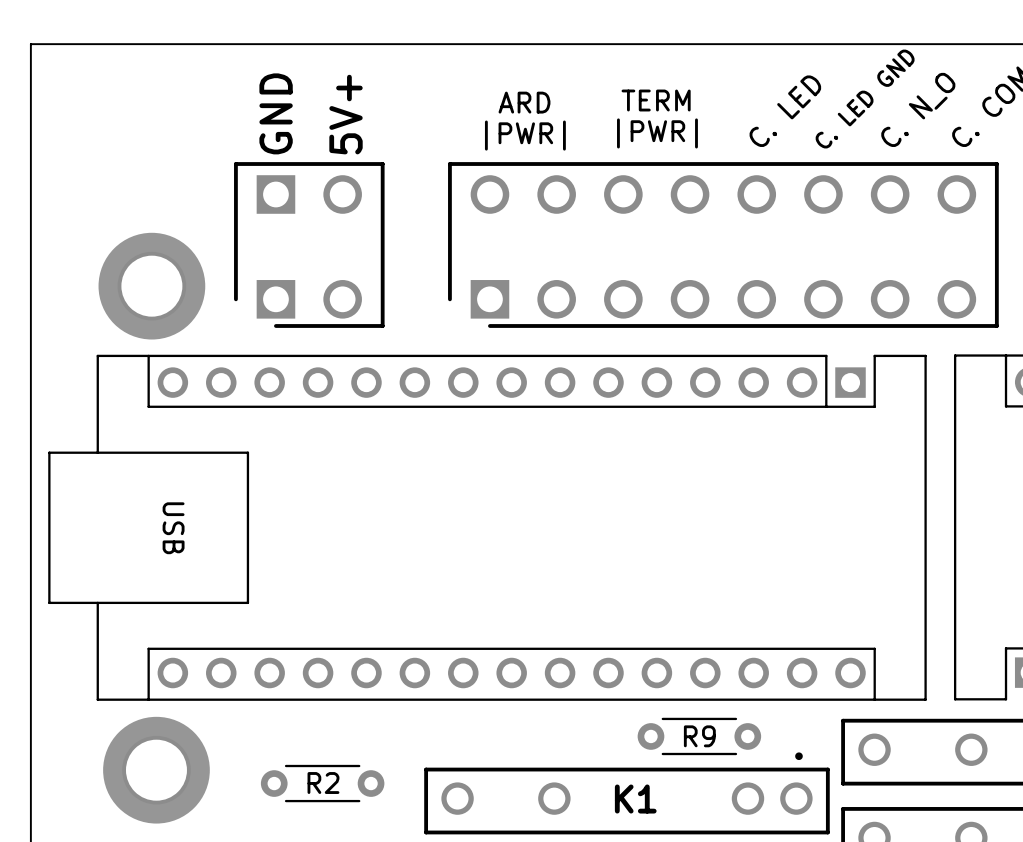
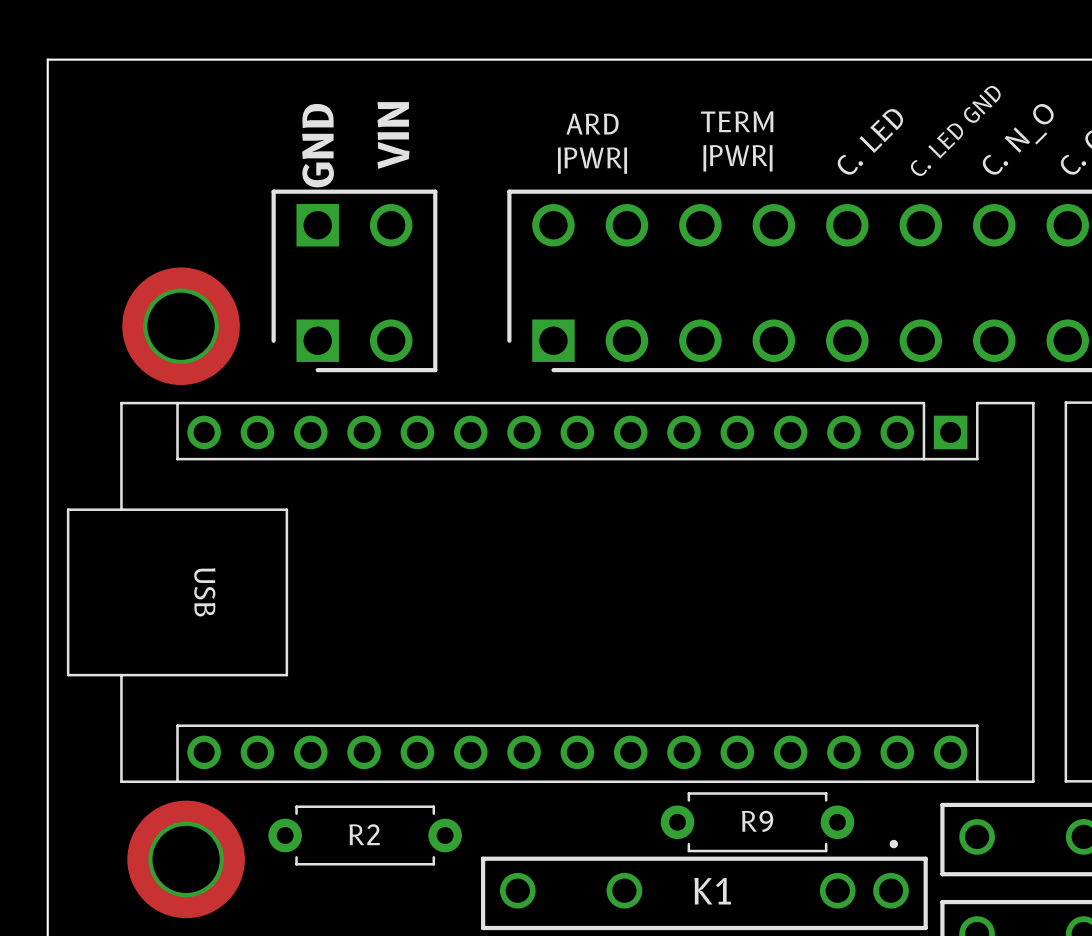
text: 5V+ (346, 114) -> VIN (393, 135)
R9 footprint: [637, 717, 762, 756] -> [660, 792, 855, 853]
R2 footprint: [260, 764, 385, 803] -> [268, 805, 462, 866]

